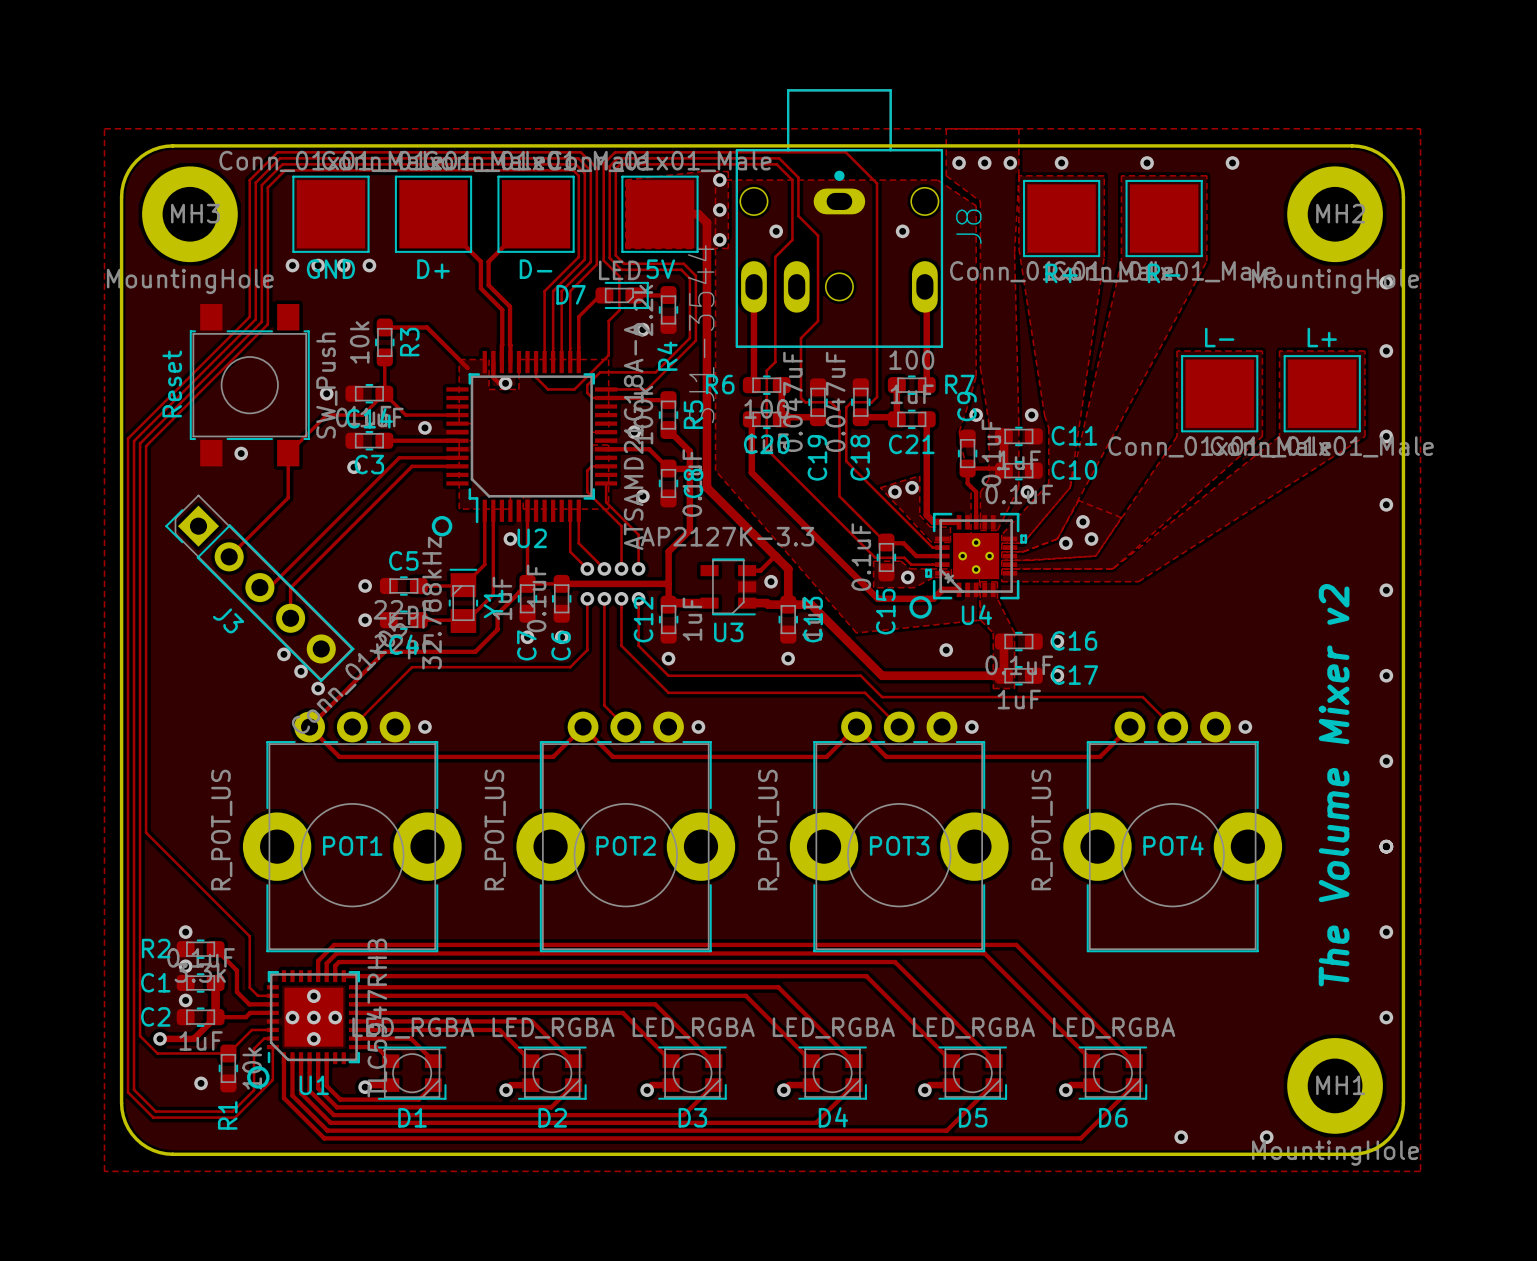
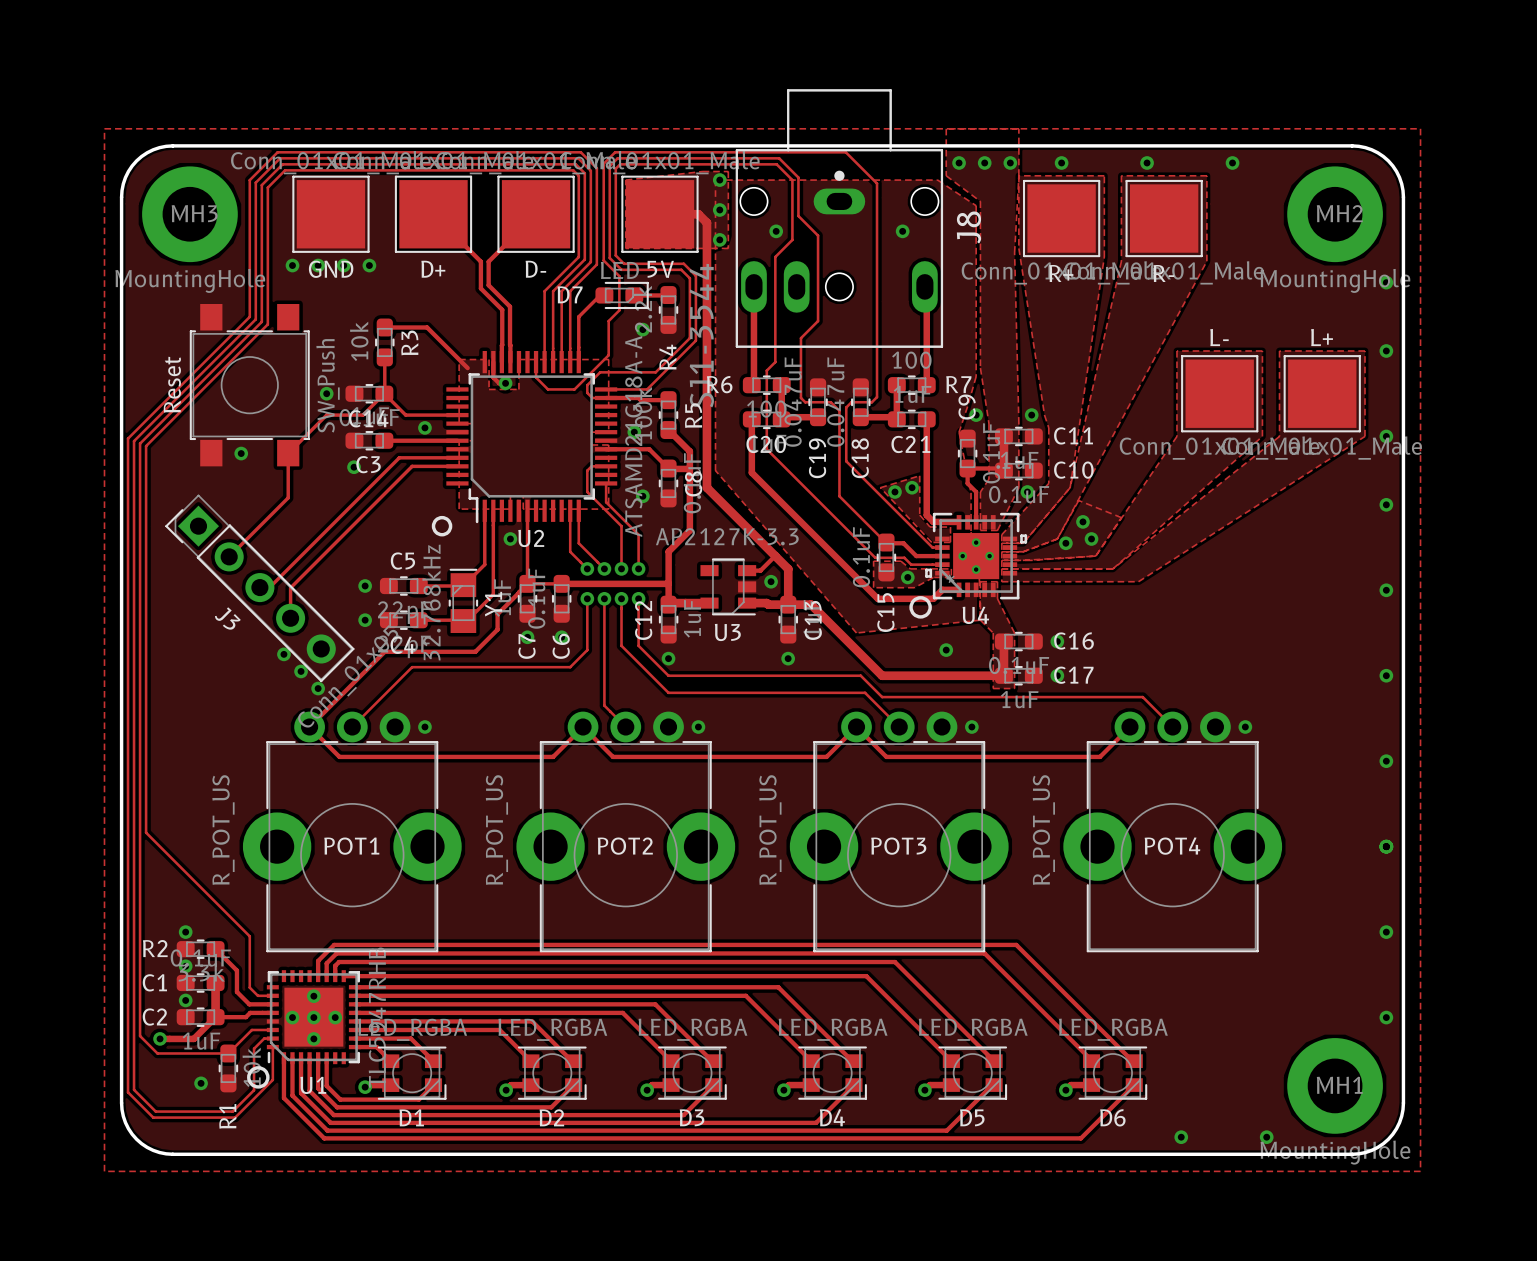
text: The Volume Mixer v2 (1334, 785) -> none

